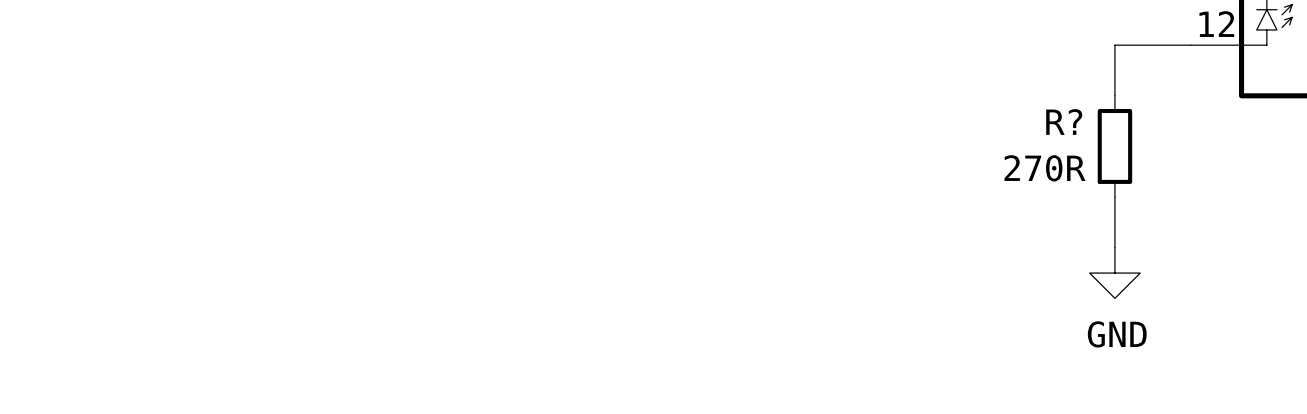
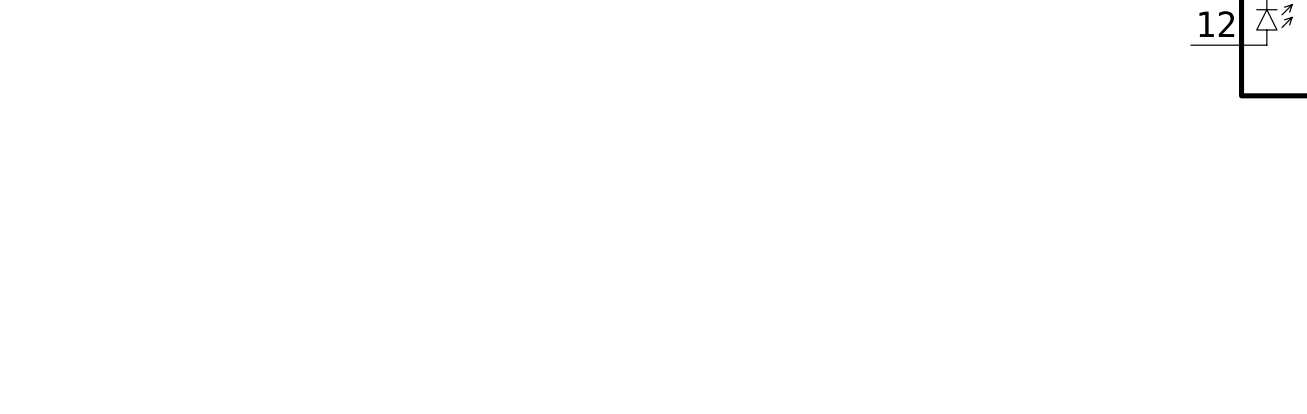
wire: (1190, 45) (1114, 45) (1114, 95) -> none
R?: 270R (1114, 146) -> none
wire: (1114, 197) (1114, 247) -> none
power symbol: GND (1114, 273) -> none

